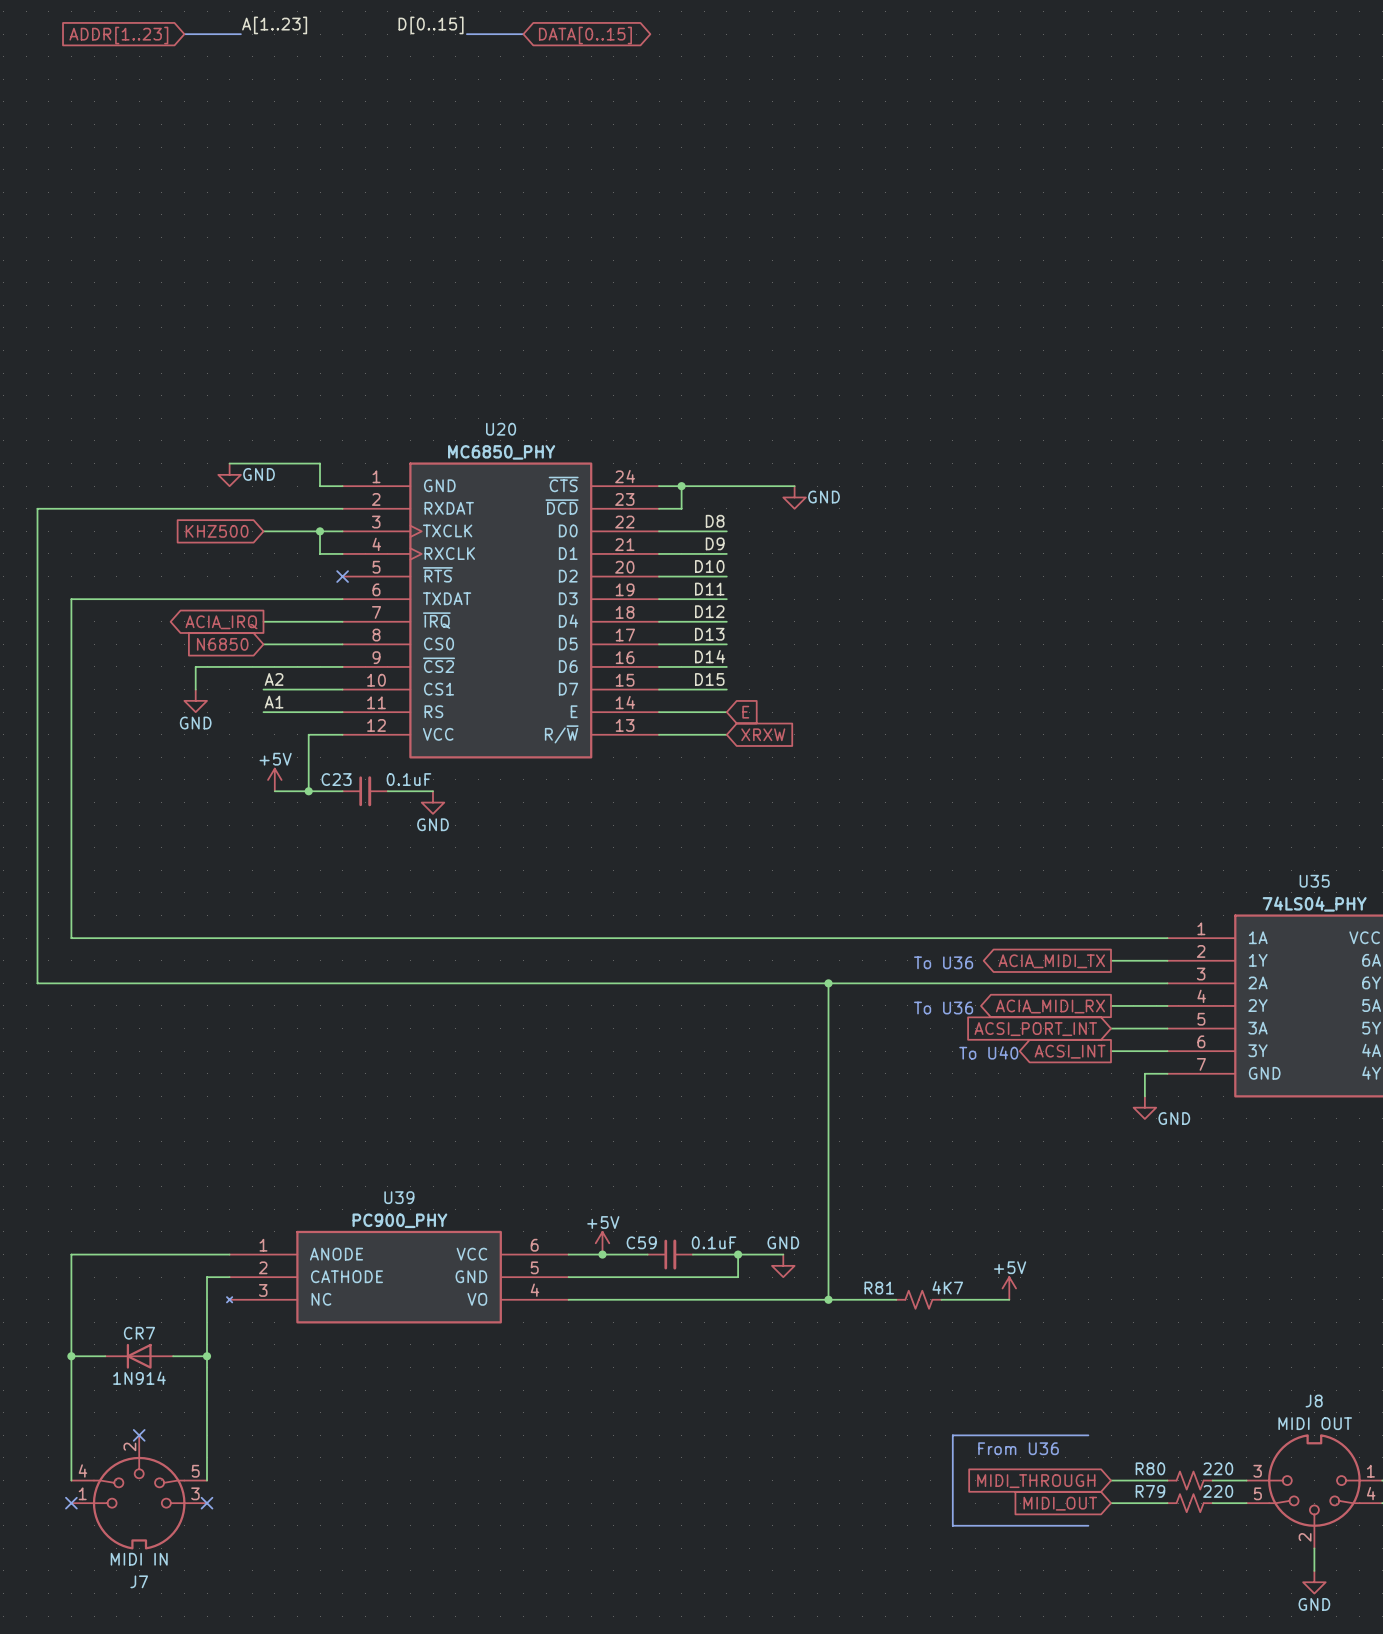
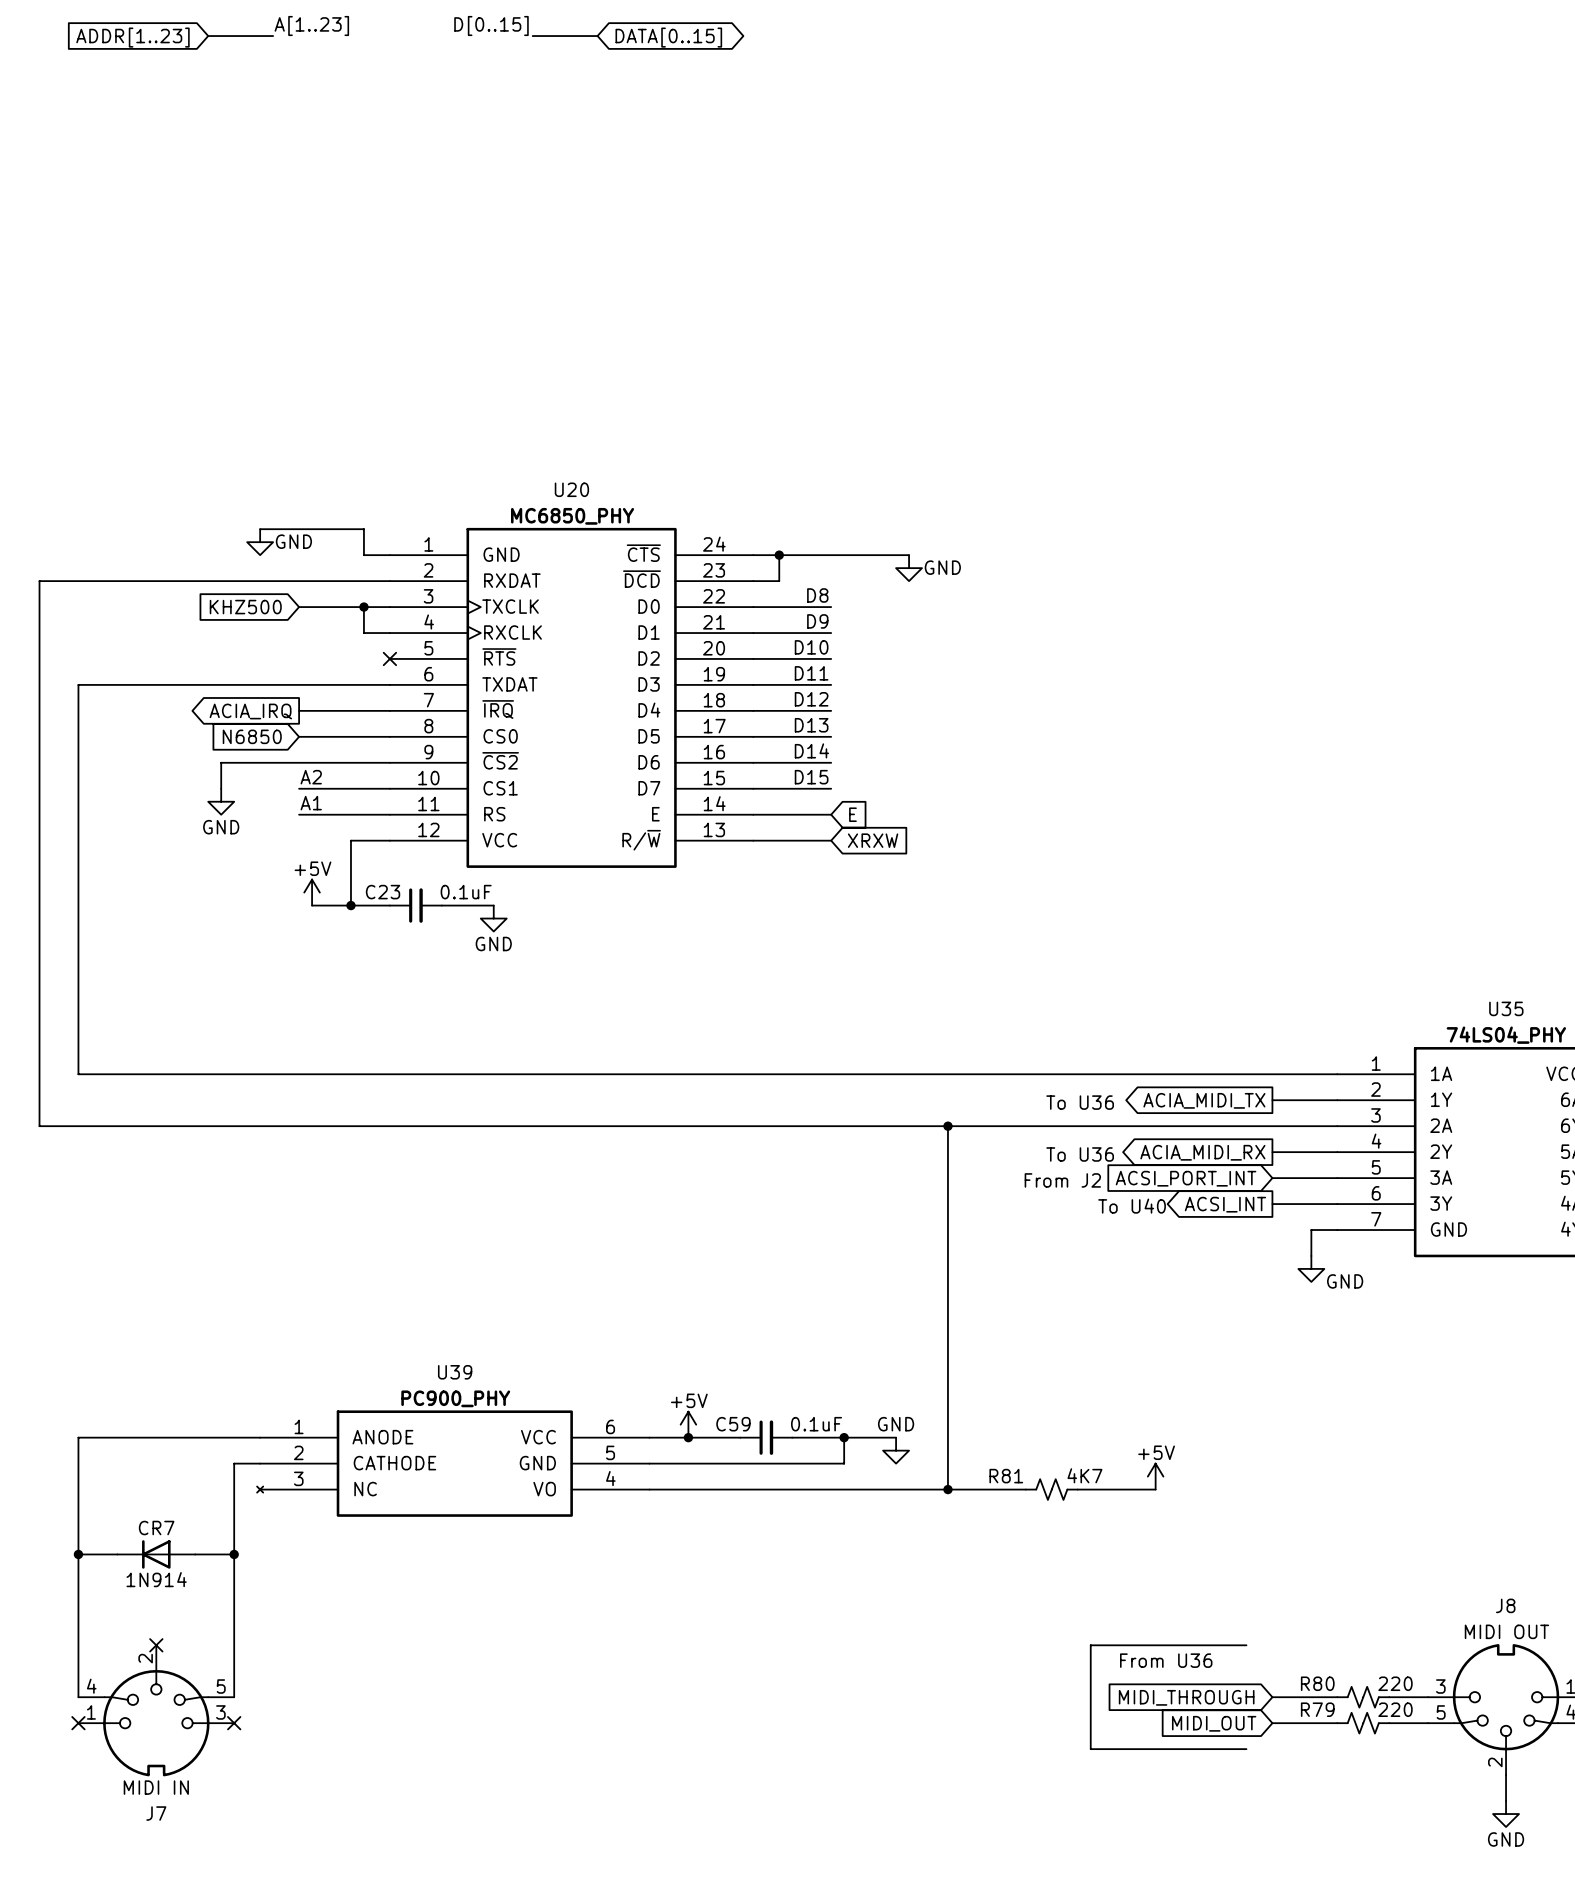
text: none -> From J2 (1062, 1180)

